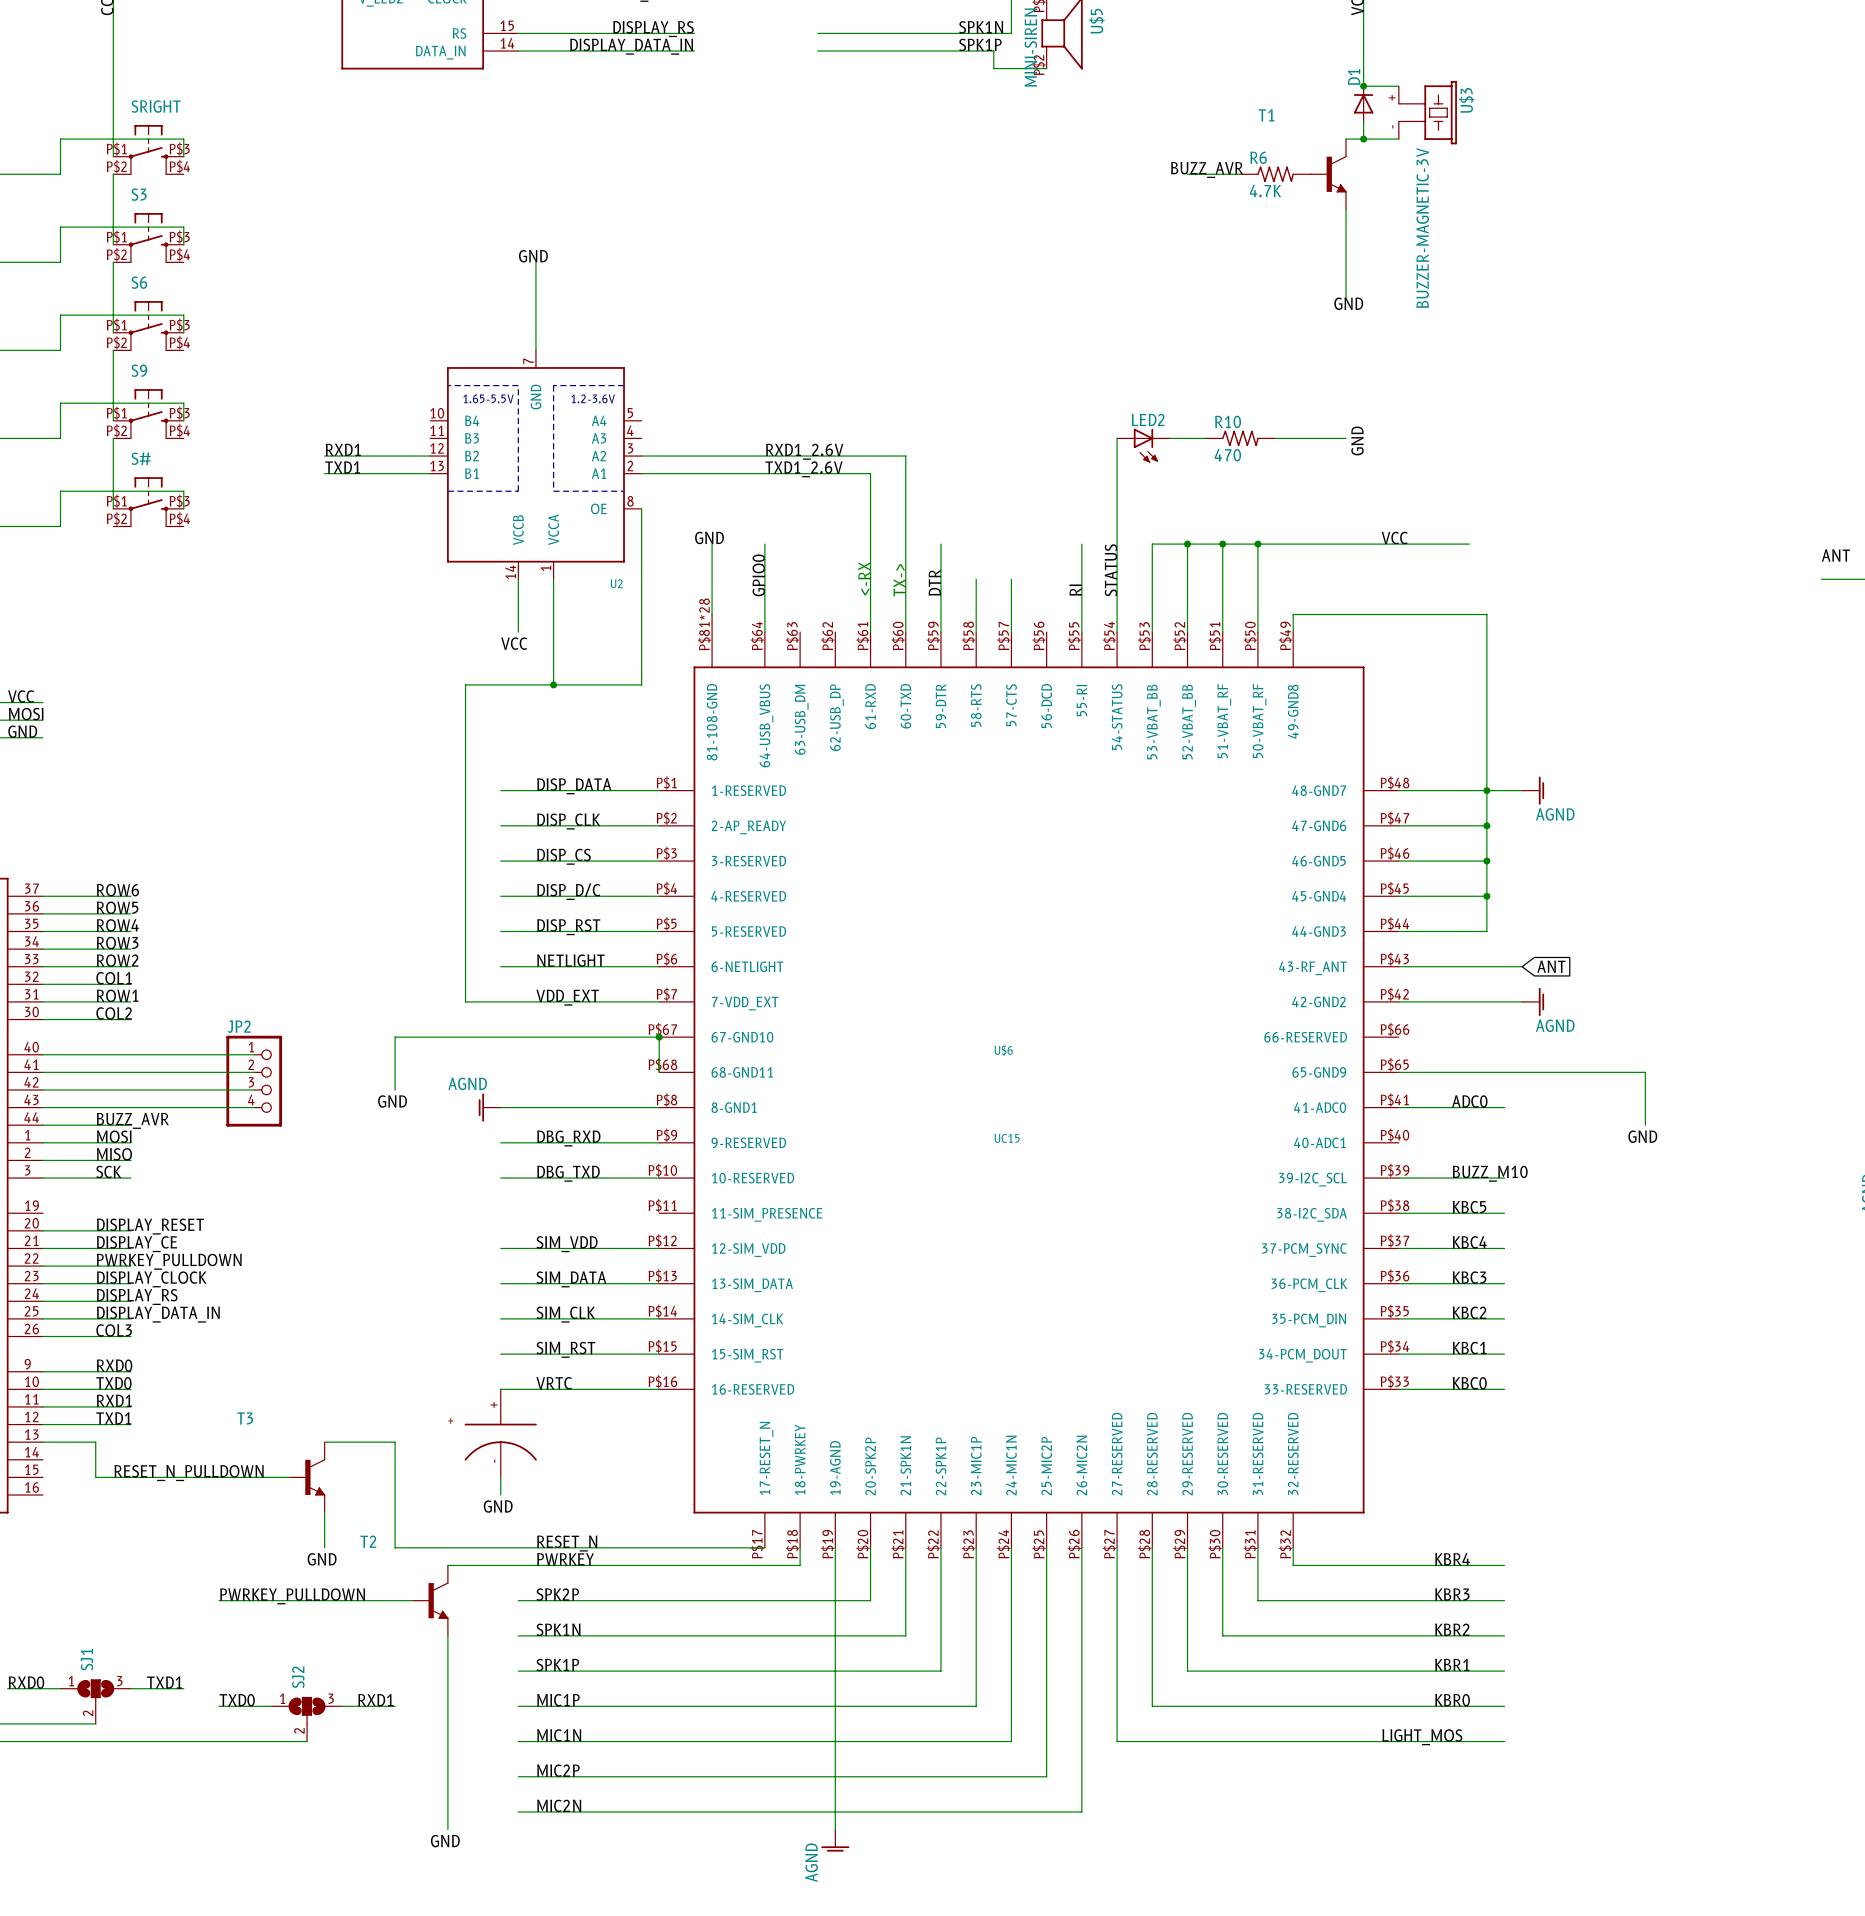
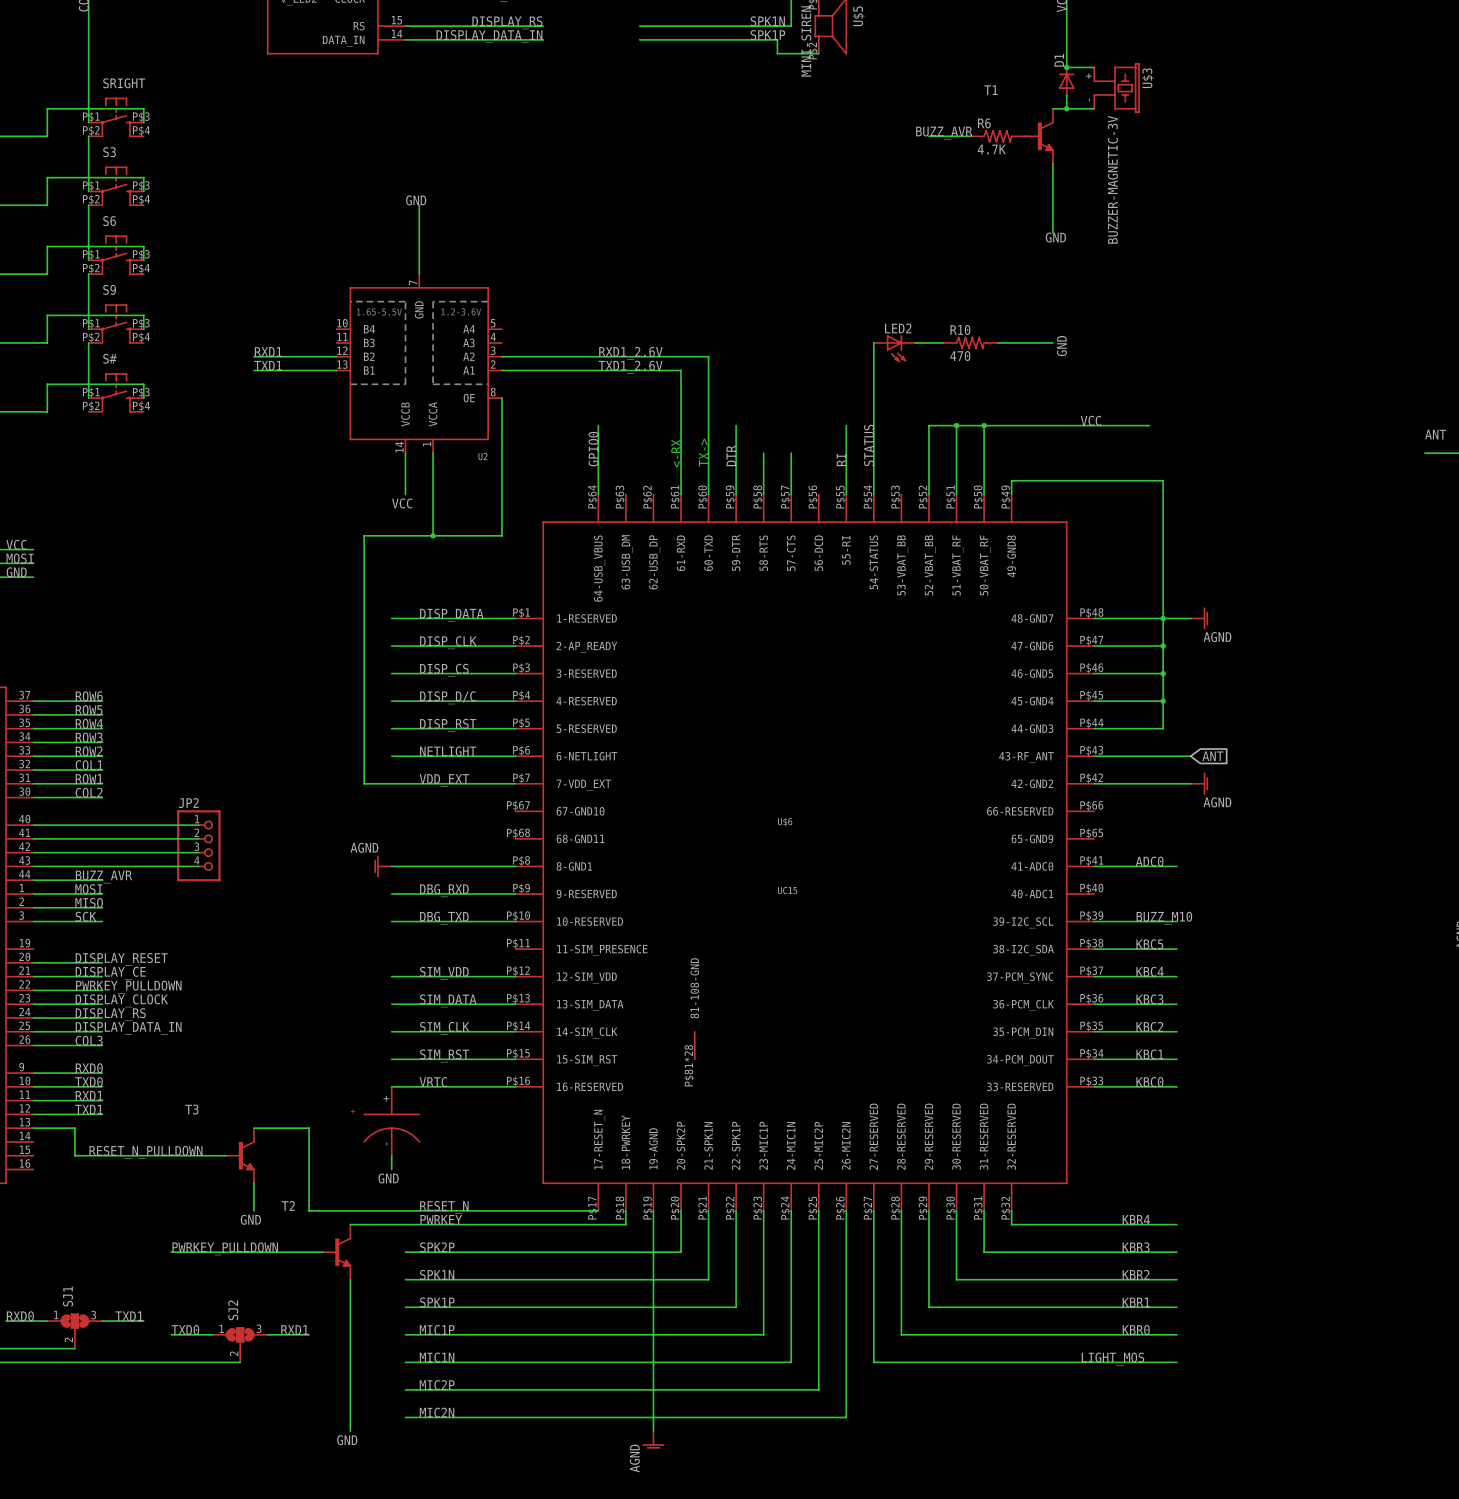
label: GND (709, 537) -> none
wire: (712, 544) (712, 614) -> none
wire: (1187, 544) (1152, 544) (1152, 632) -> none
junction: (1187, 544) -> none
U$6 symbol: [659, 614, 1399, 1548] -> [515, 494, 1095, 1211]
junction: (659, 1037) -> none
wire: (659, 1072) (659, 1037) (395, 1037) (395, 1089) -> none
wire: (1398, 1072) (1645, 1072) (1645, 1125) -> none
label: GND (392, 1101) -> none
label: GND (1642, 1136) -> none

